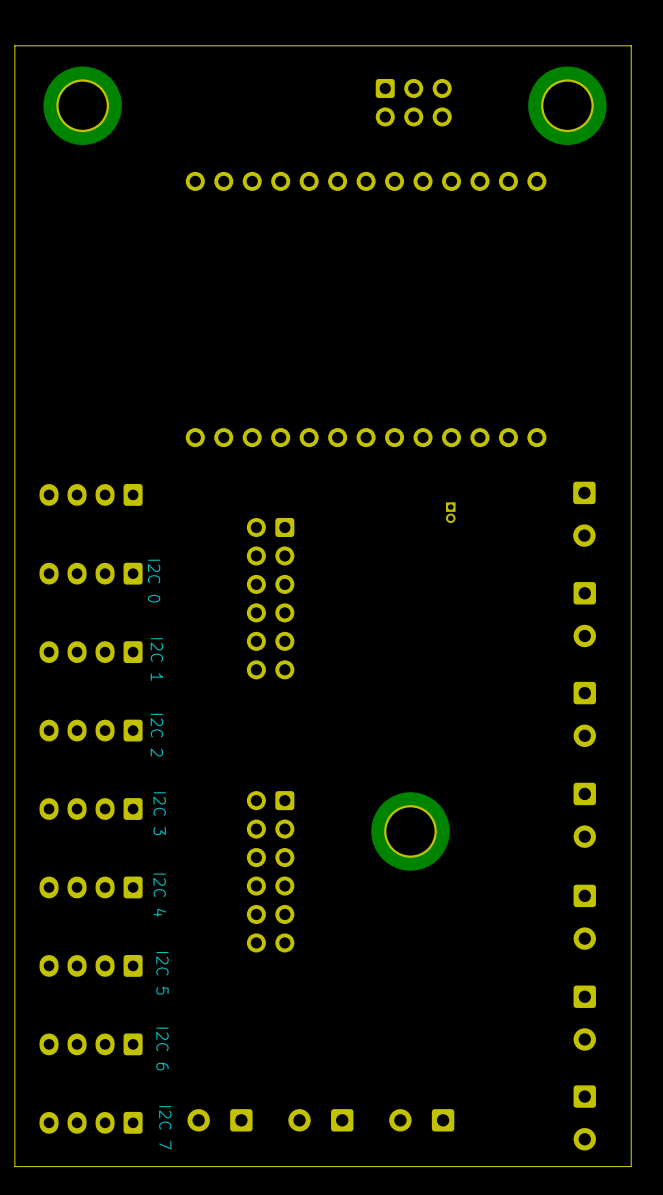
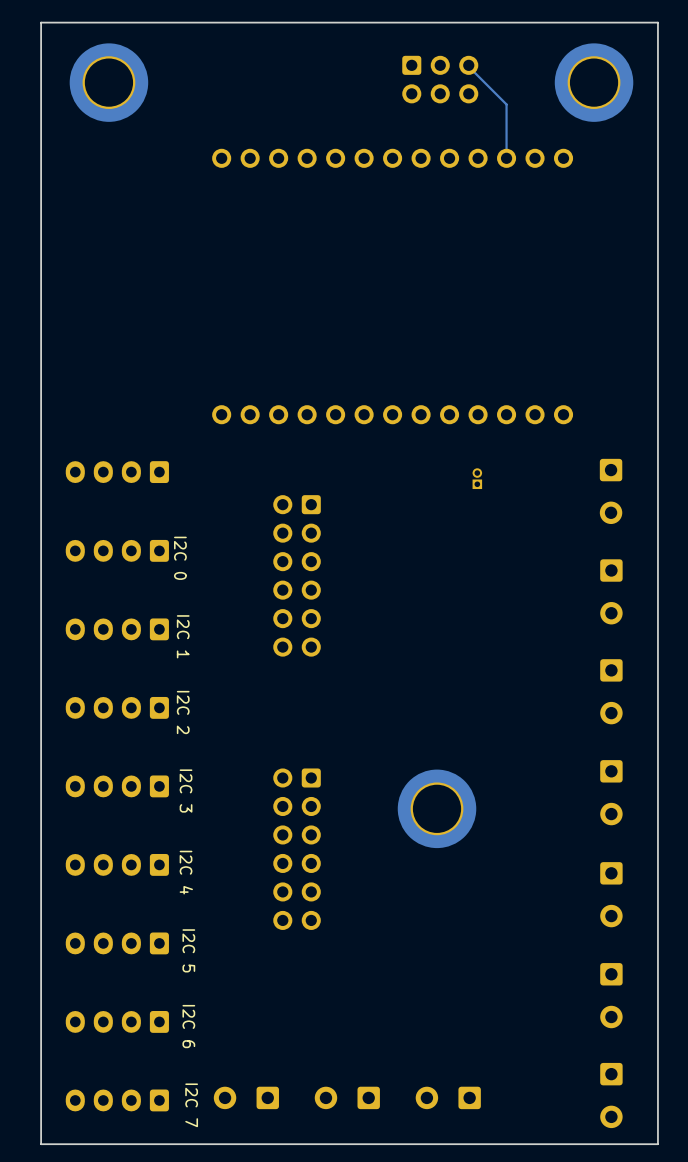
track: none -> (468, 65) (506, 104) (506, 158)
part rotation: 0° (450, 512) -> 180° (477, 478)

